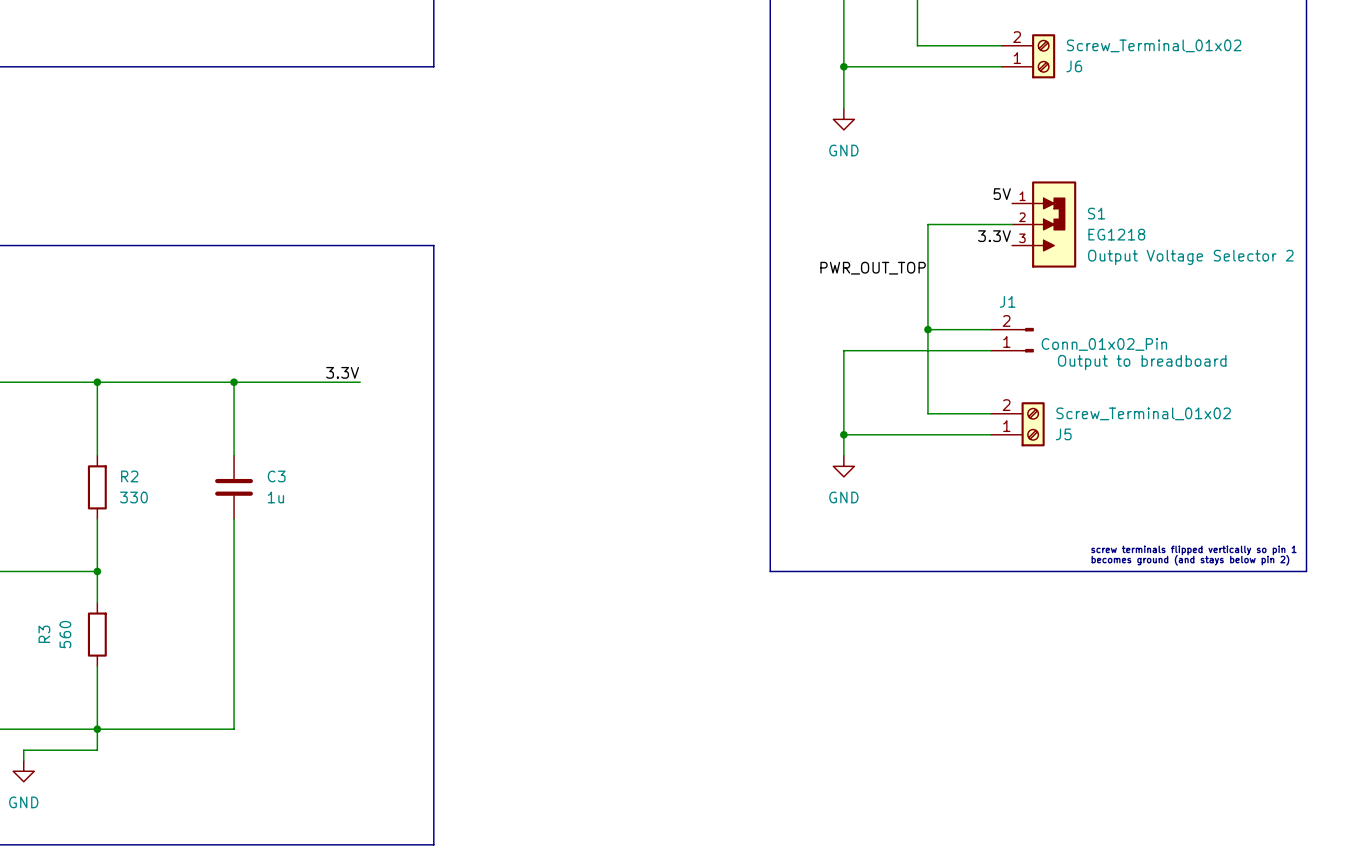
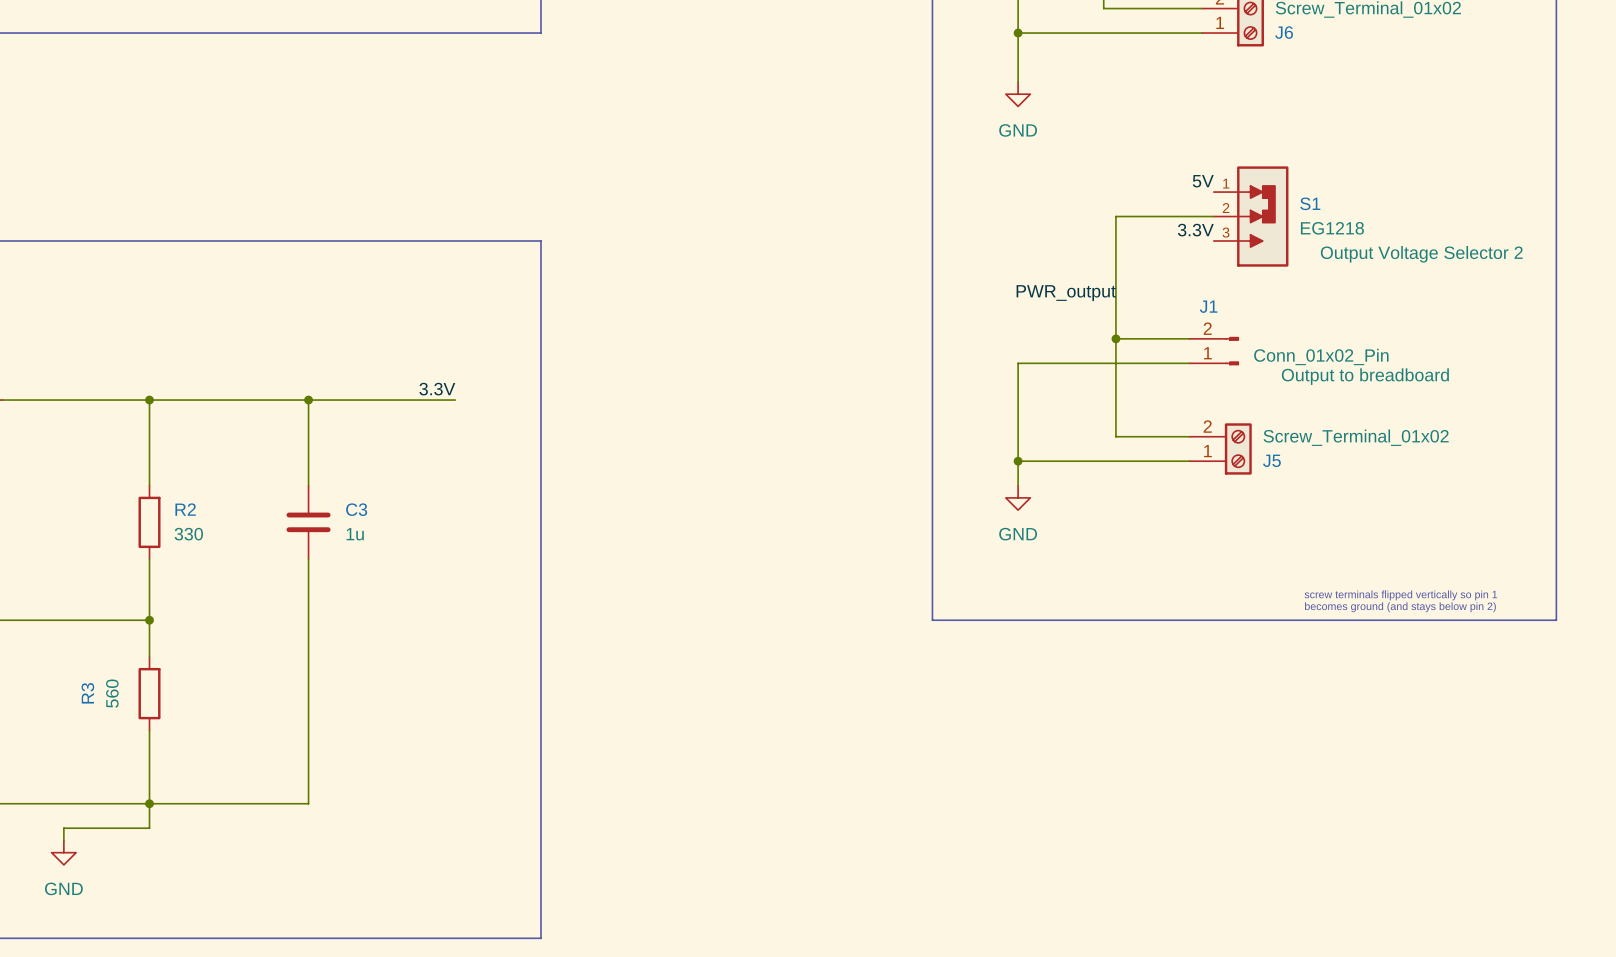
label: PWR_OUT_TOP (873, 268) -> none
label: none -> PWR_output (1066, 293)

